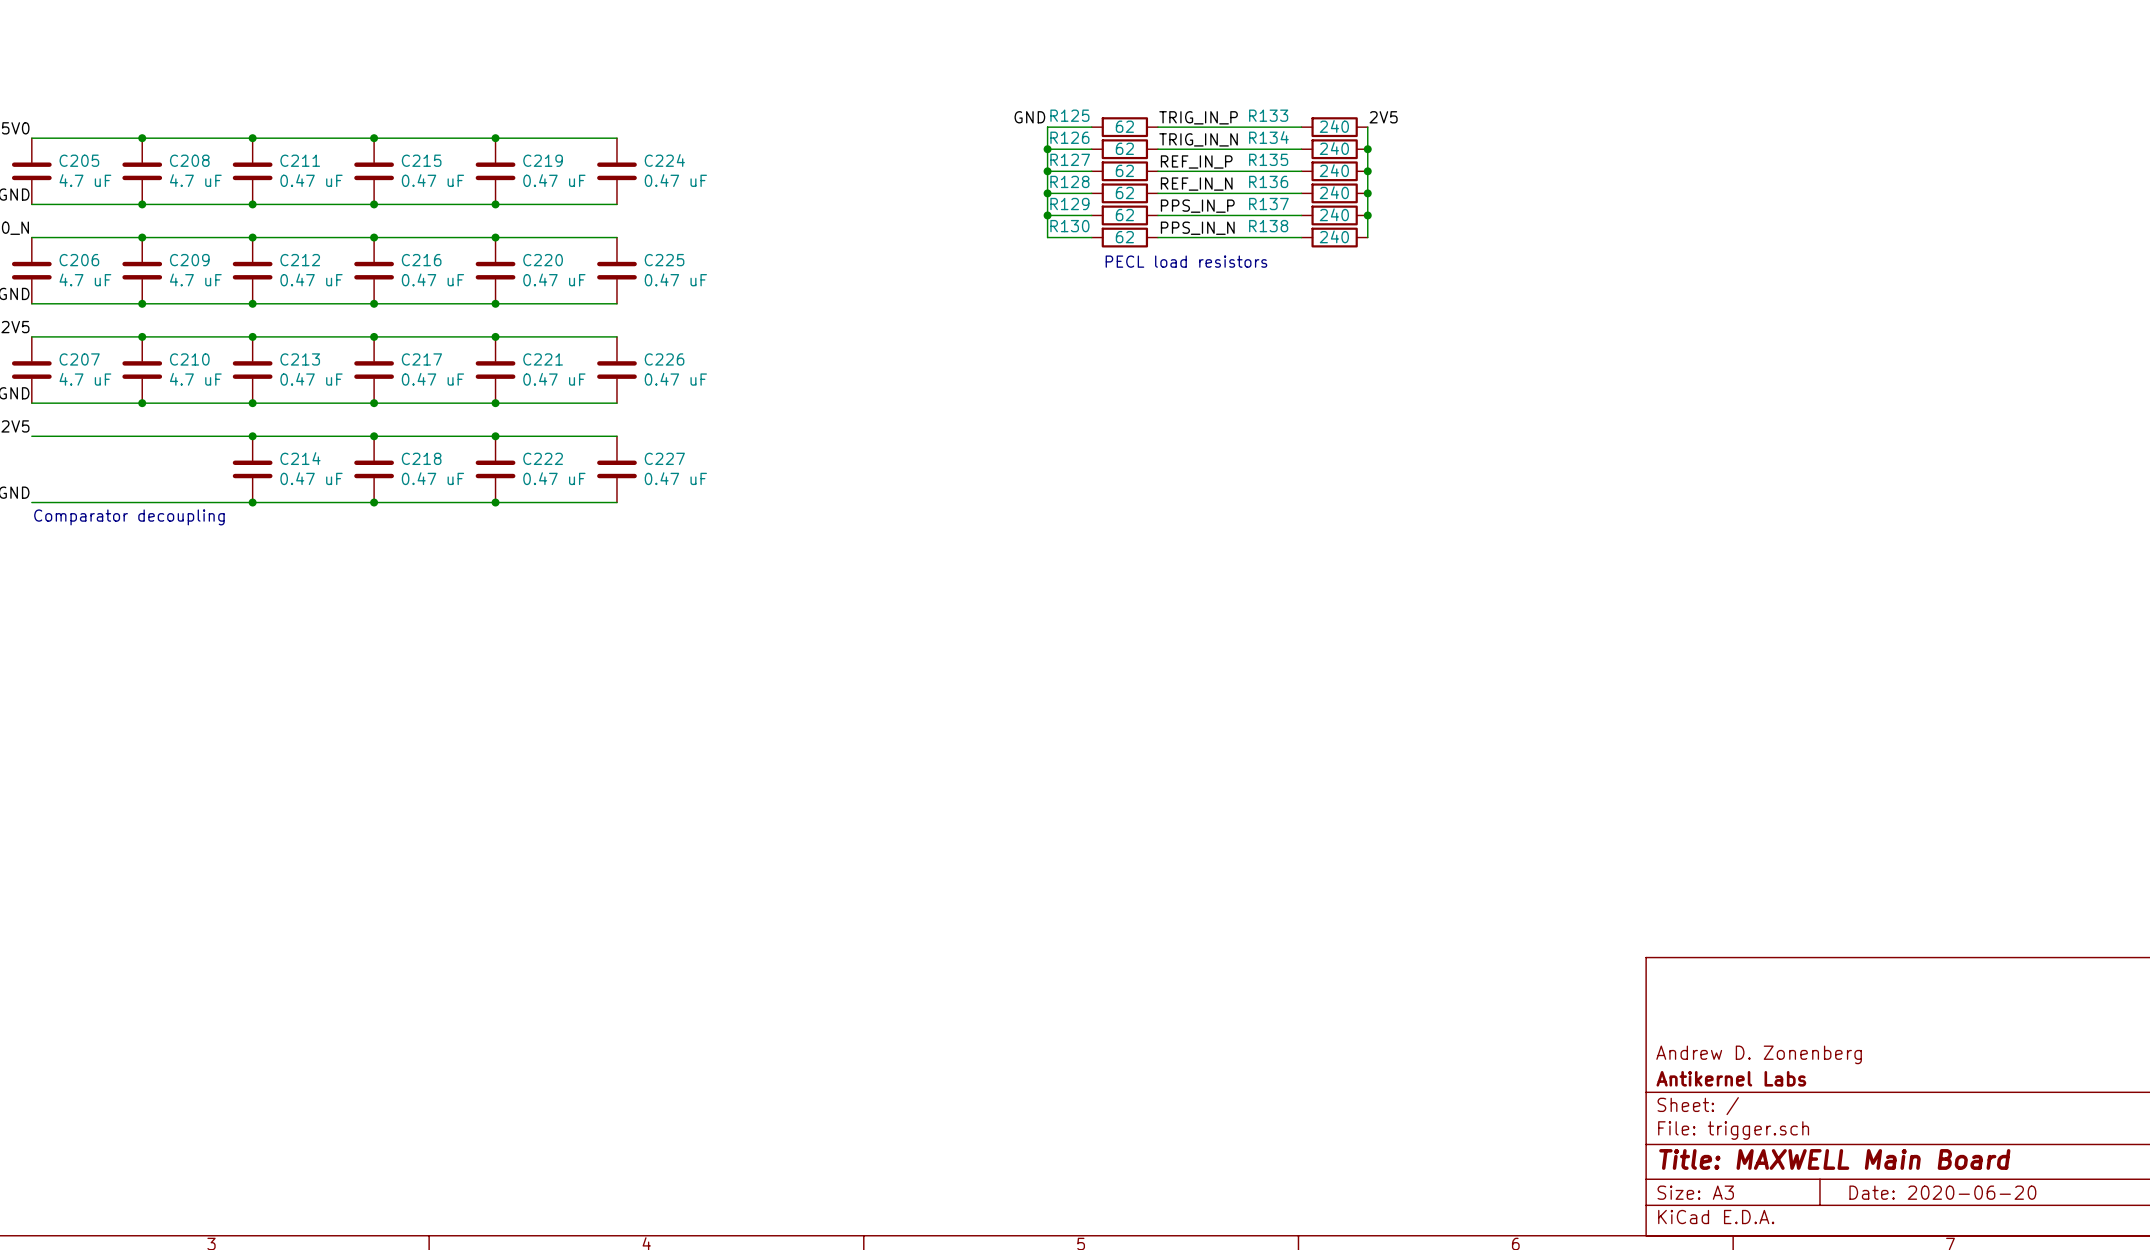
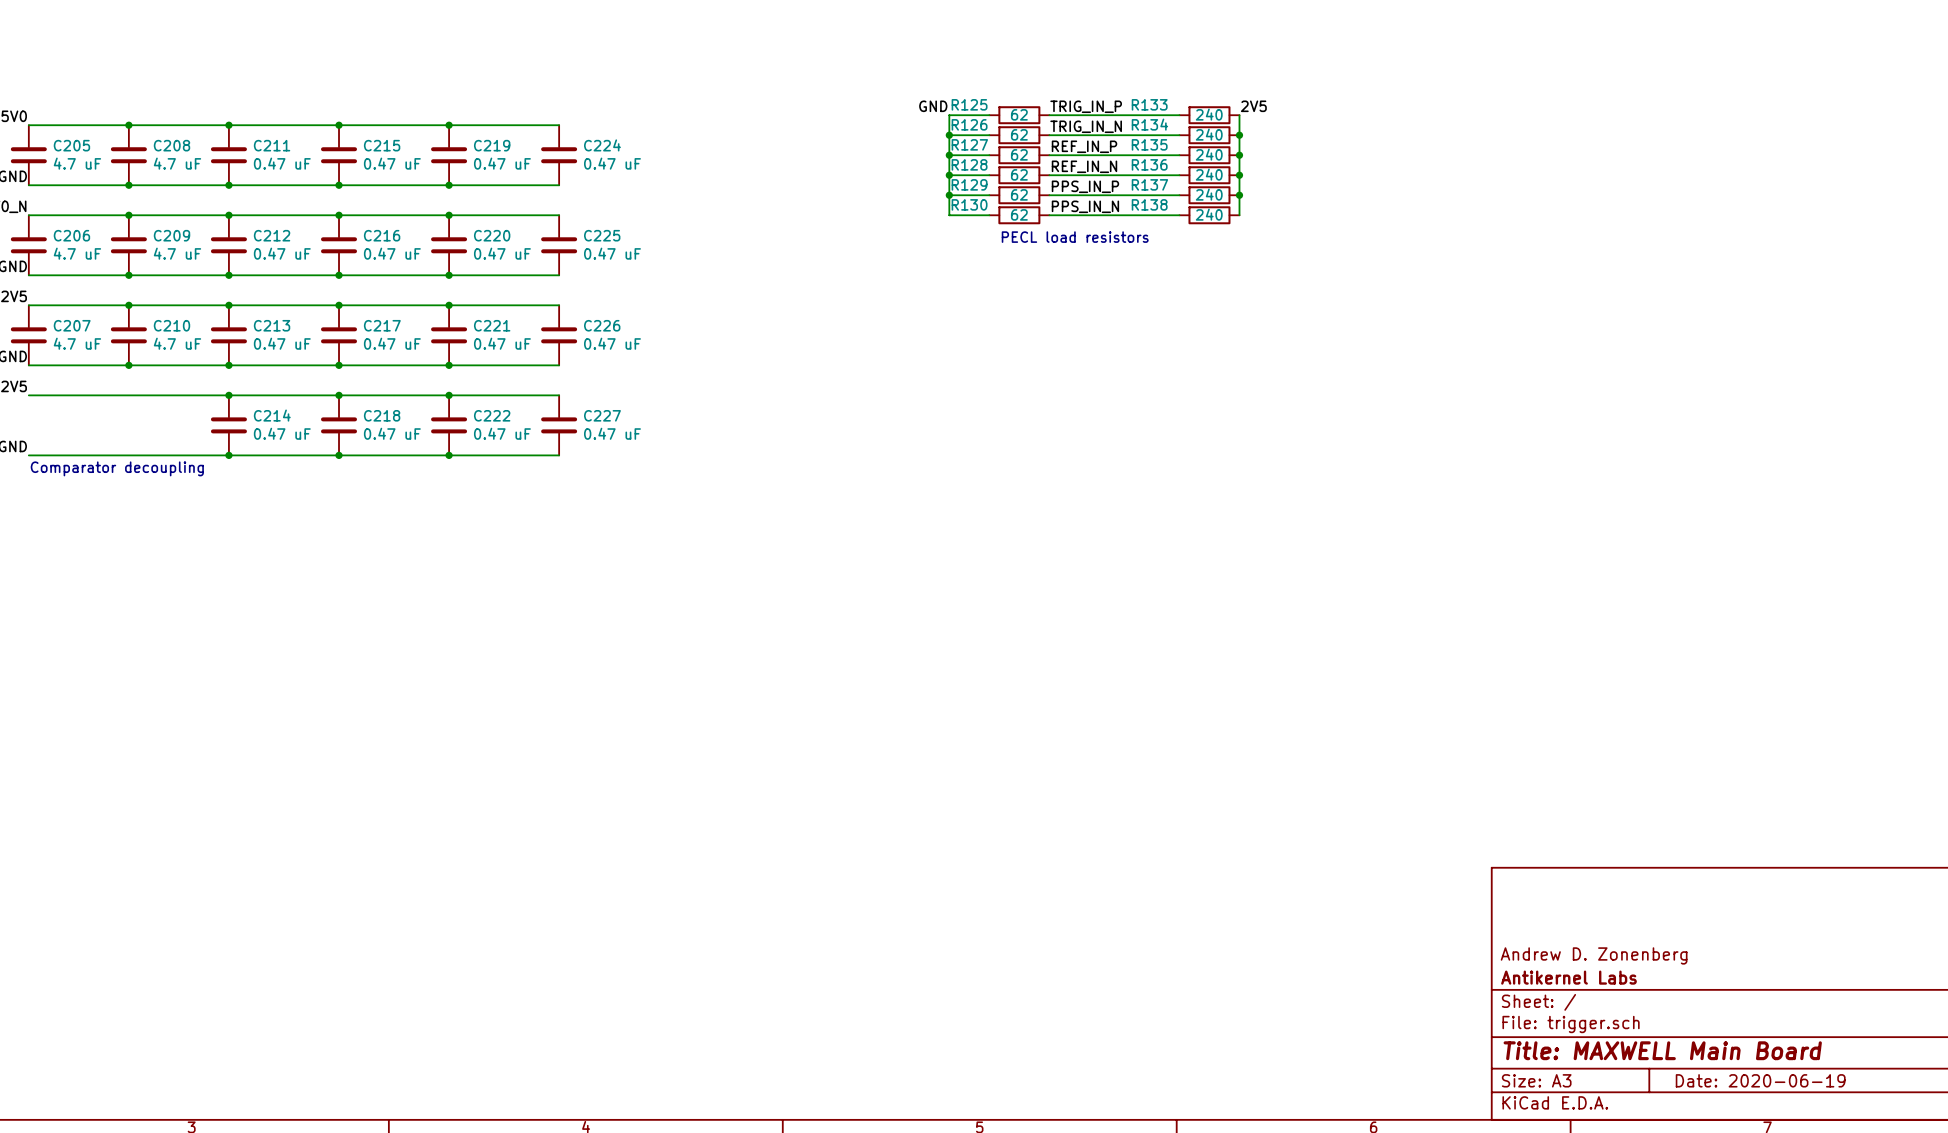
title block: Date: 2020-06-20 (1942, 1192) -> Date: 2020-06-19 (1760, 1080)

